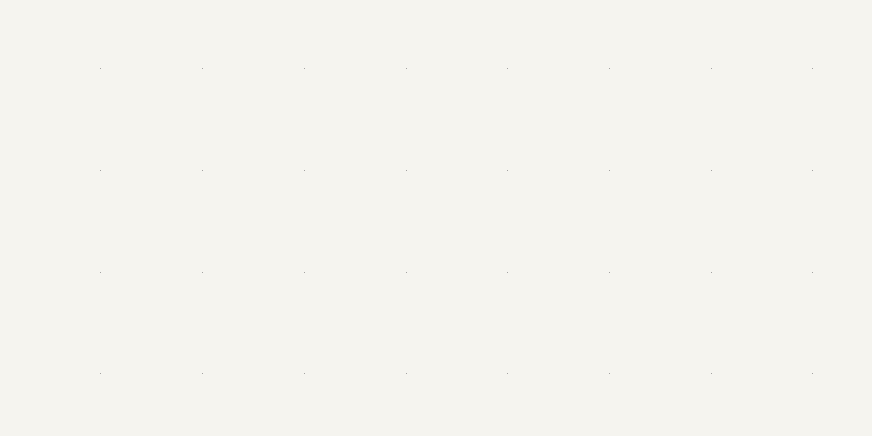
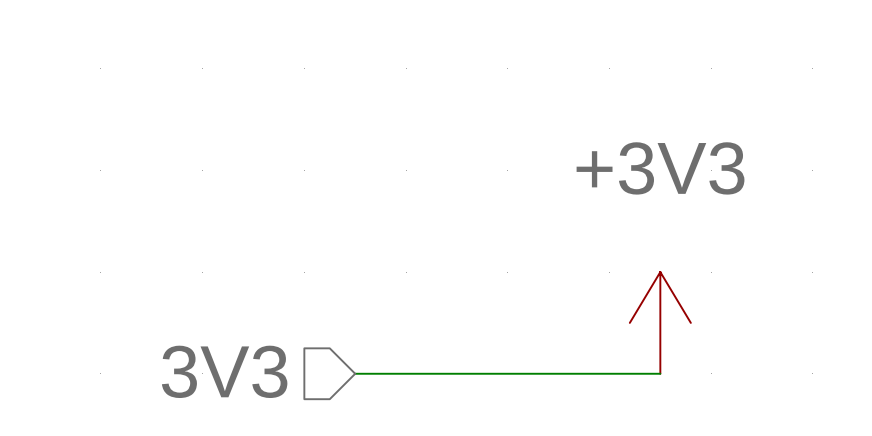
power symbol: none -> +3V3 (660, 322)
hierarchical label: none -> 3V3 (224, 371)
wire: none -> (355, 373) (660, 373)

